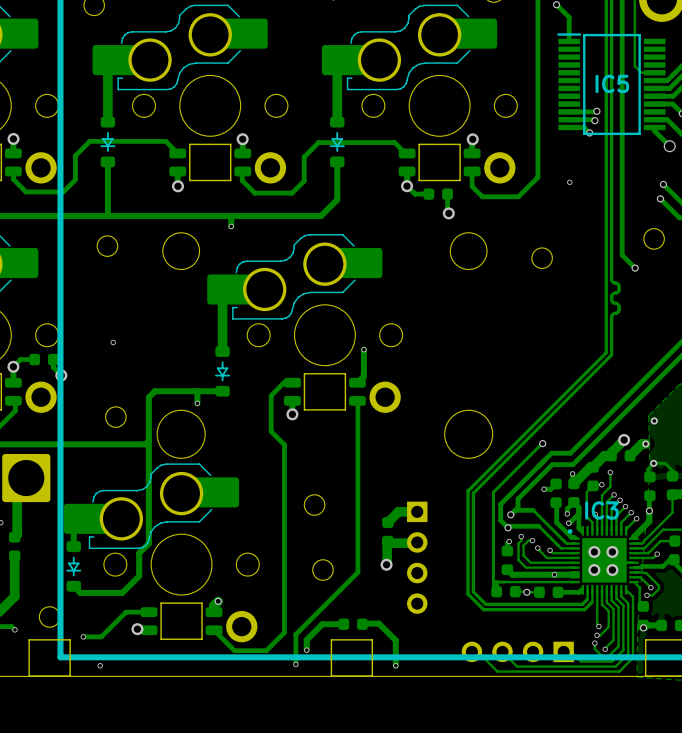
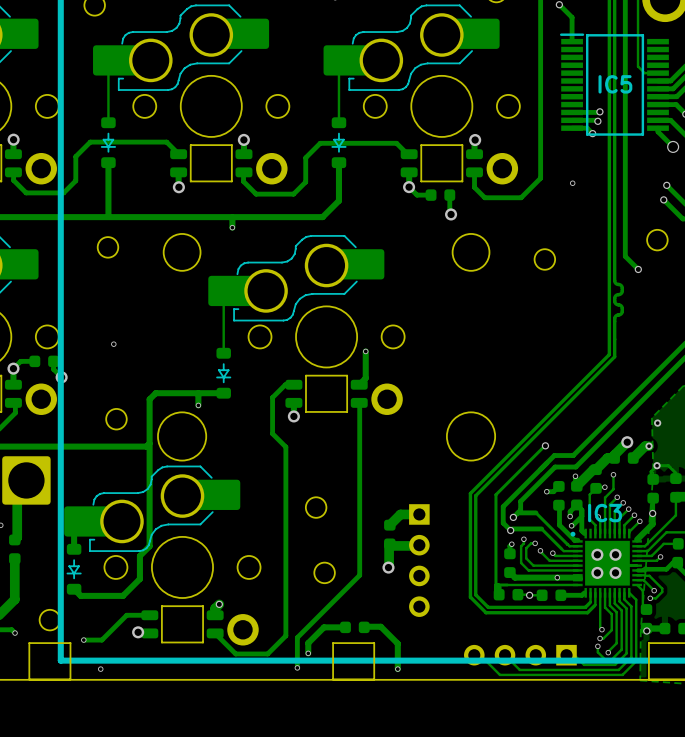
track width: thick (107, 67) (107, 122) -> thin (108, 68) (108, 122)
track width: thick (337, 67) (337, 122) -> thin (338, 68) (338, 122)
track width: thick (222, 297) (222, 351) -> thin (223, 298) (223, 353)

